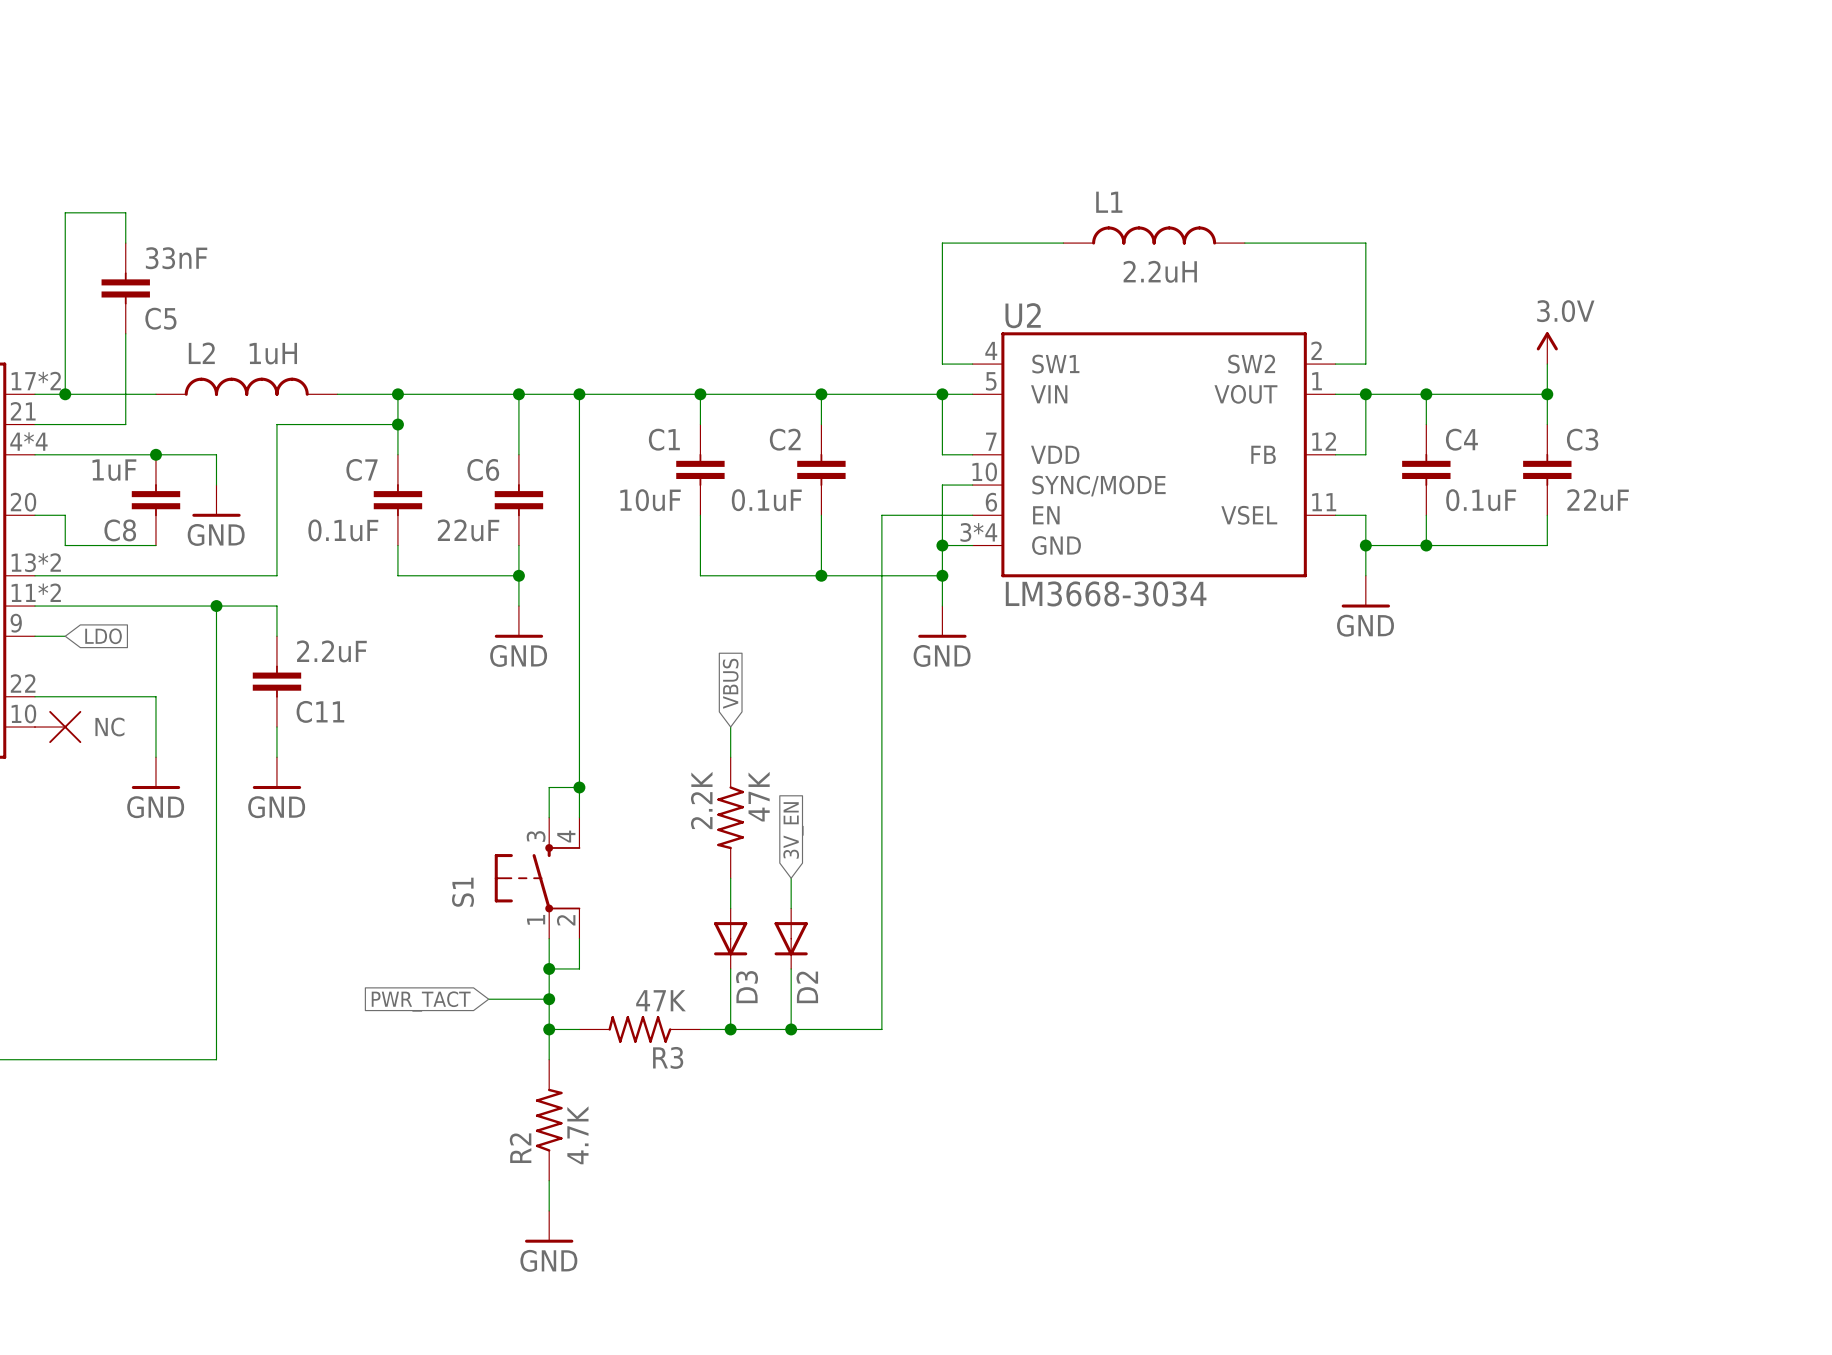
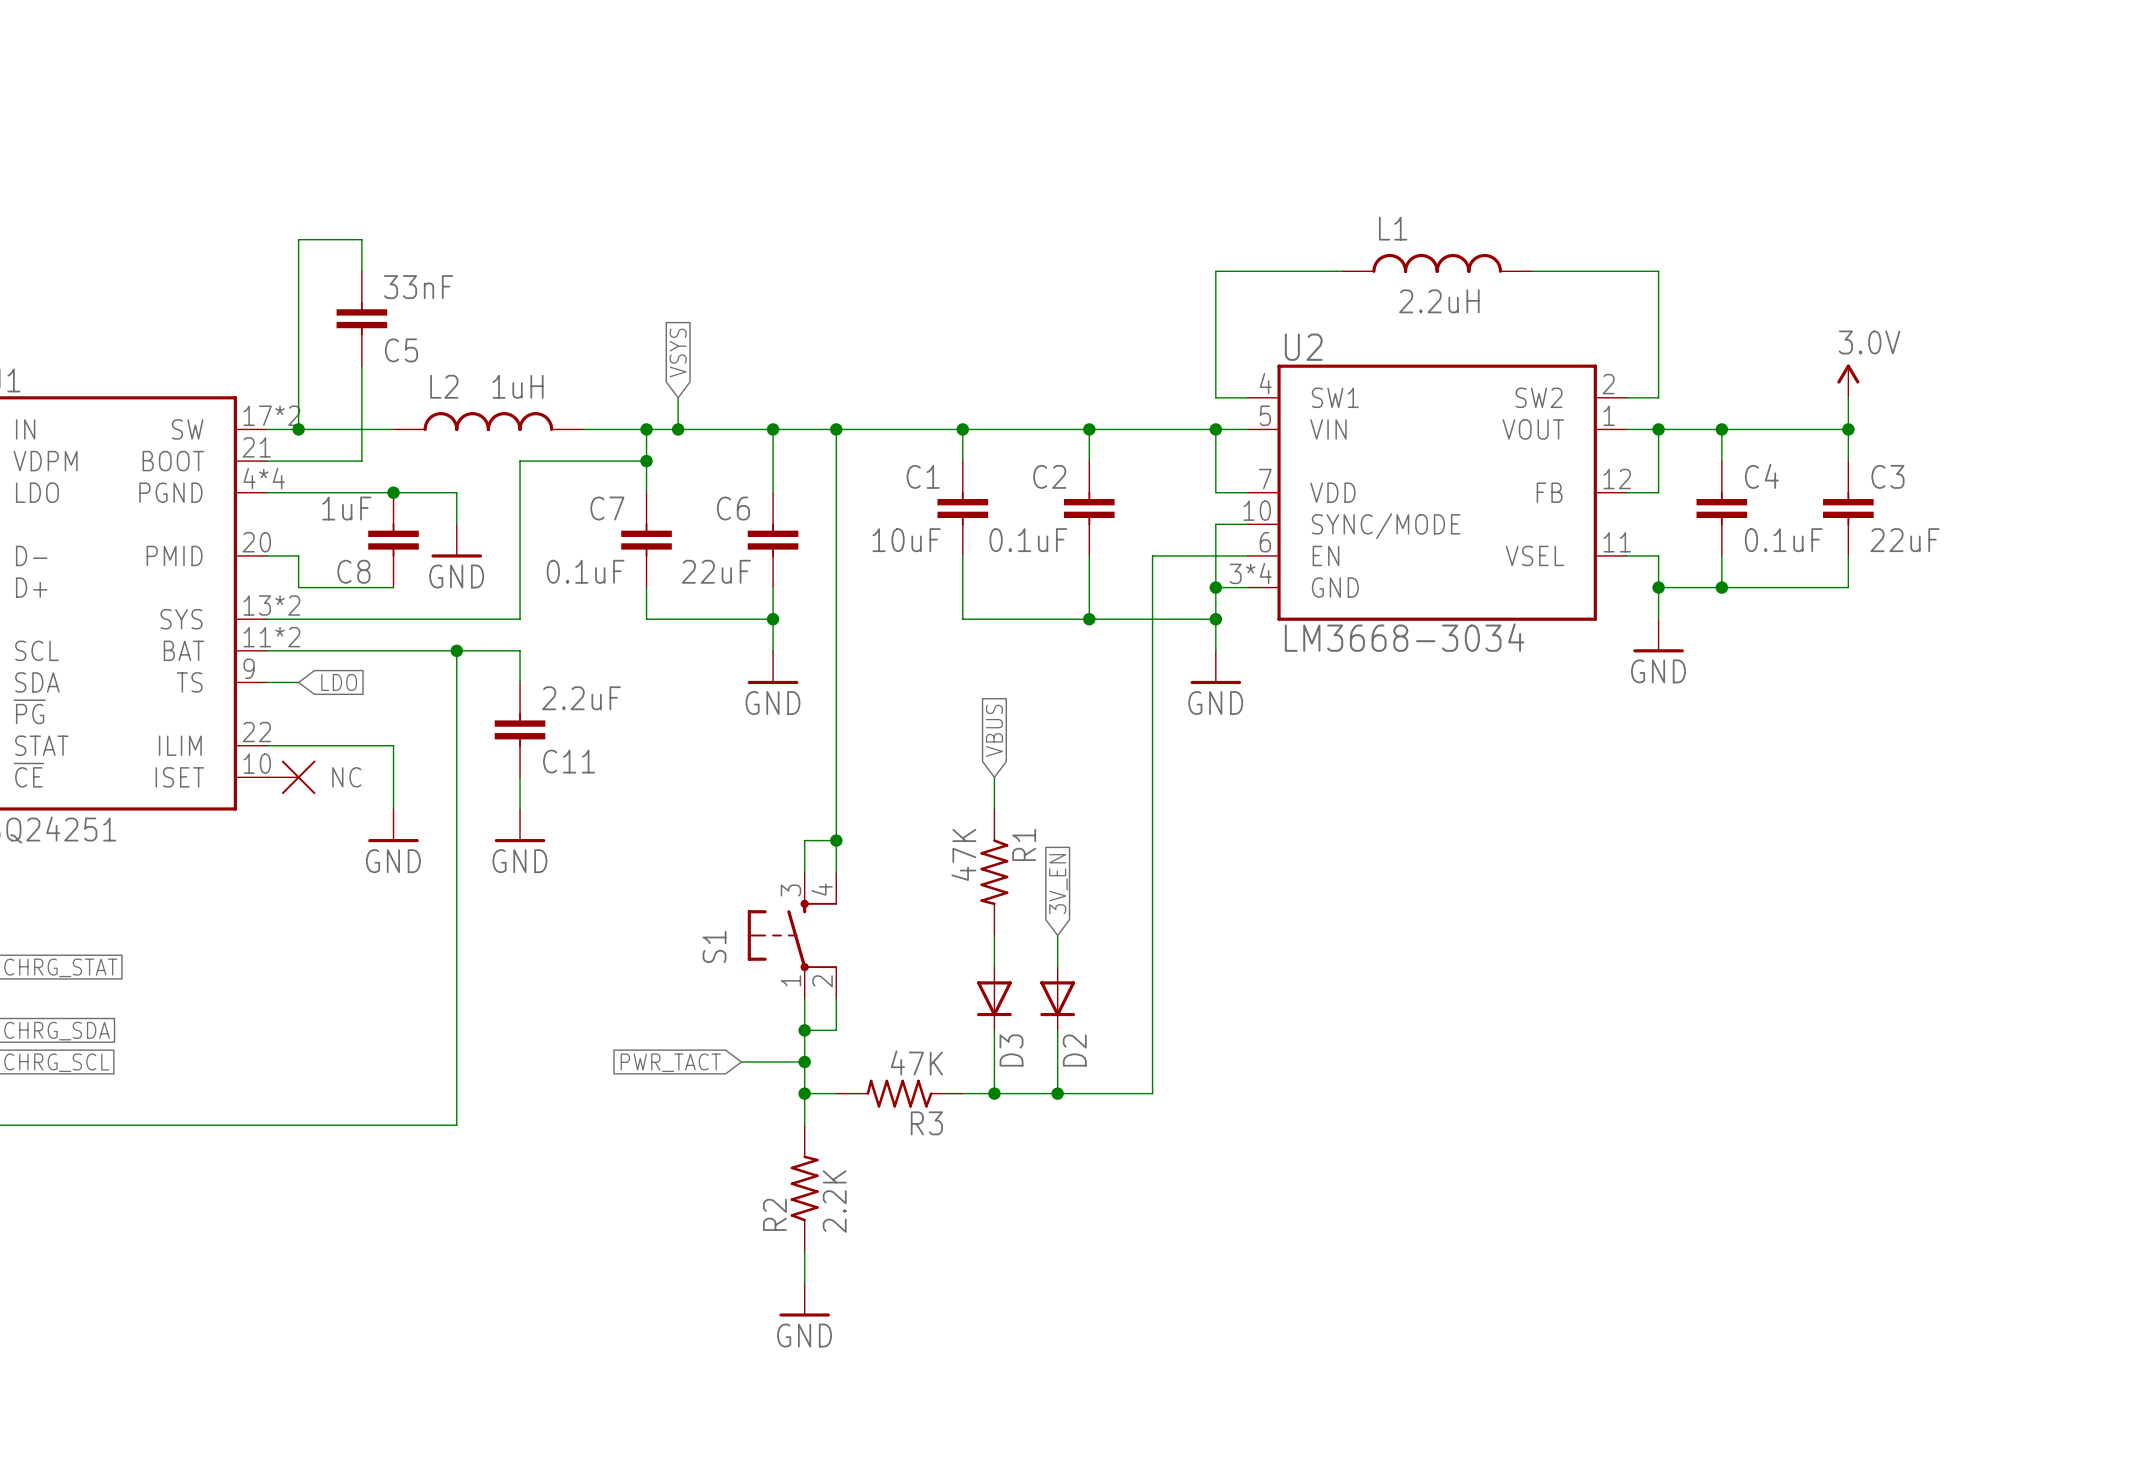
global label: none -> VSYS (678, 352)
wire: none -> (678, 397) (678, 429)
junction: none -> (678, 429)
47K name: 47K (759, 796) -> R1 (1024, 844)
47K value: 2.2K (701, 800) -> 47K (963, 854)
R2 value: 4.7K (577, 1135) -> 2.2K (834, 1201)

